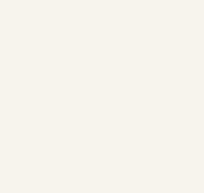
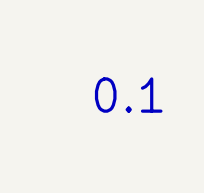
text: none -> 0.1 (128, 95)

